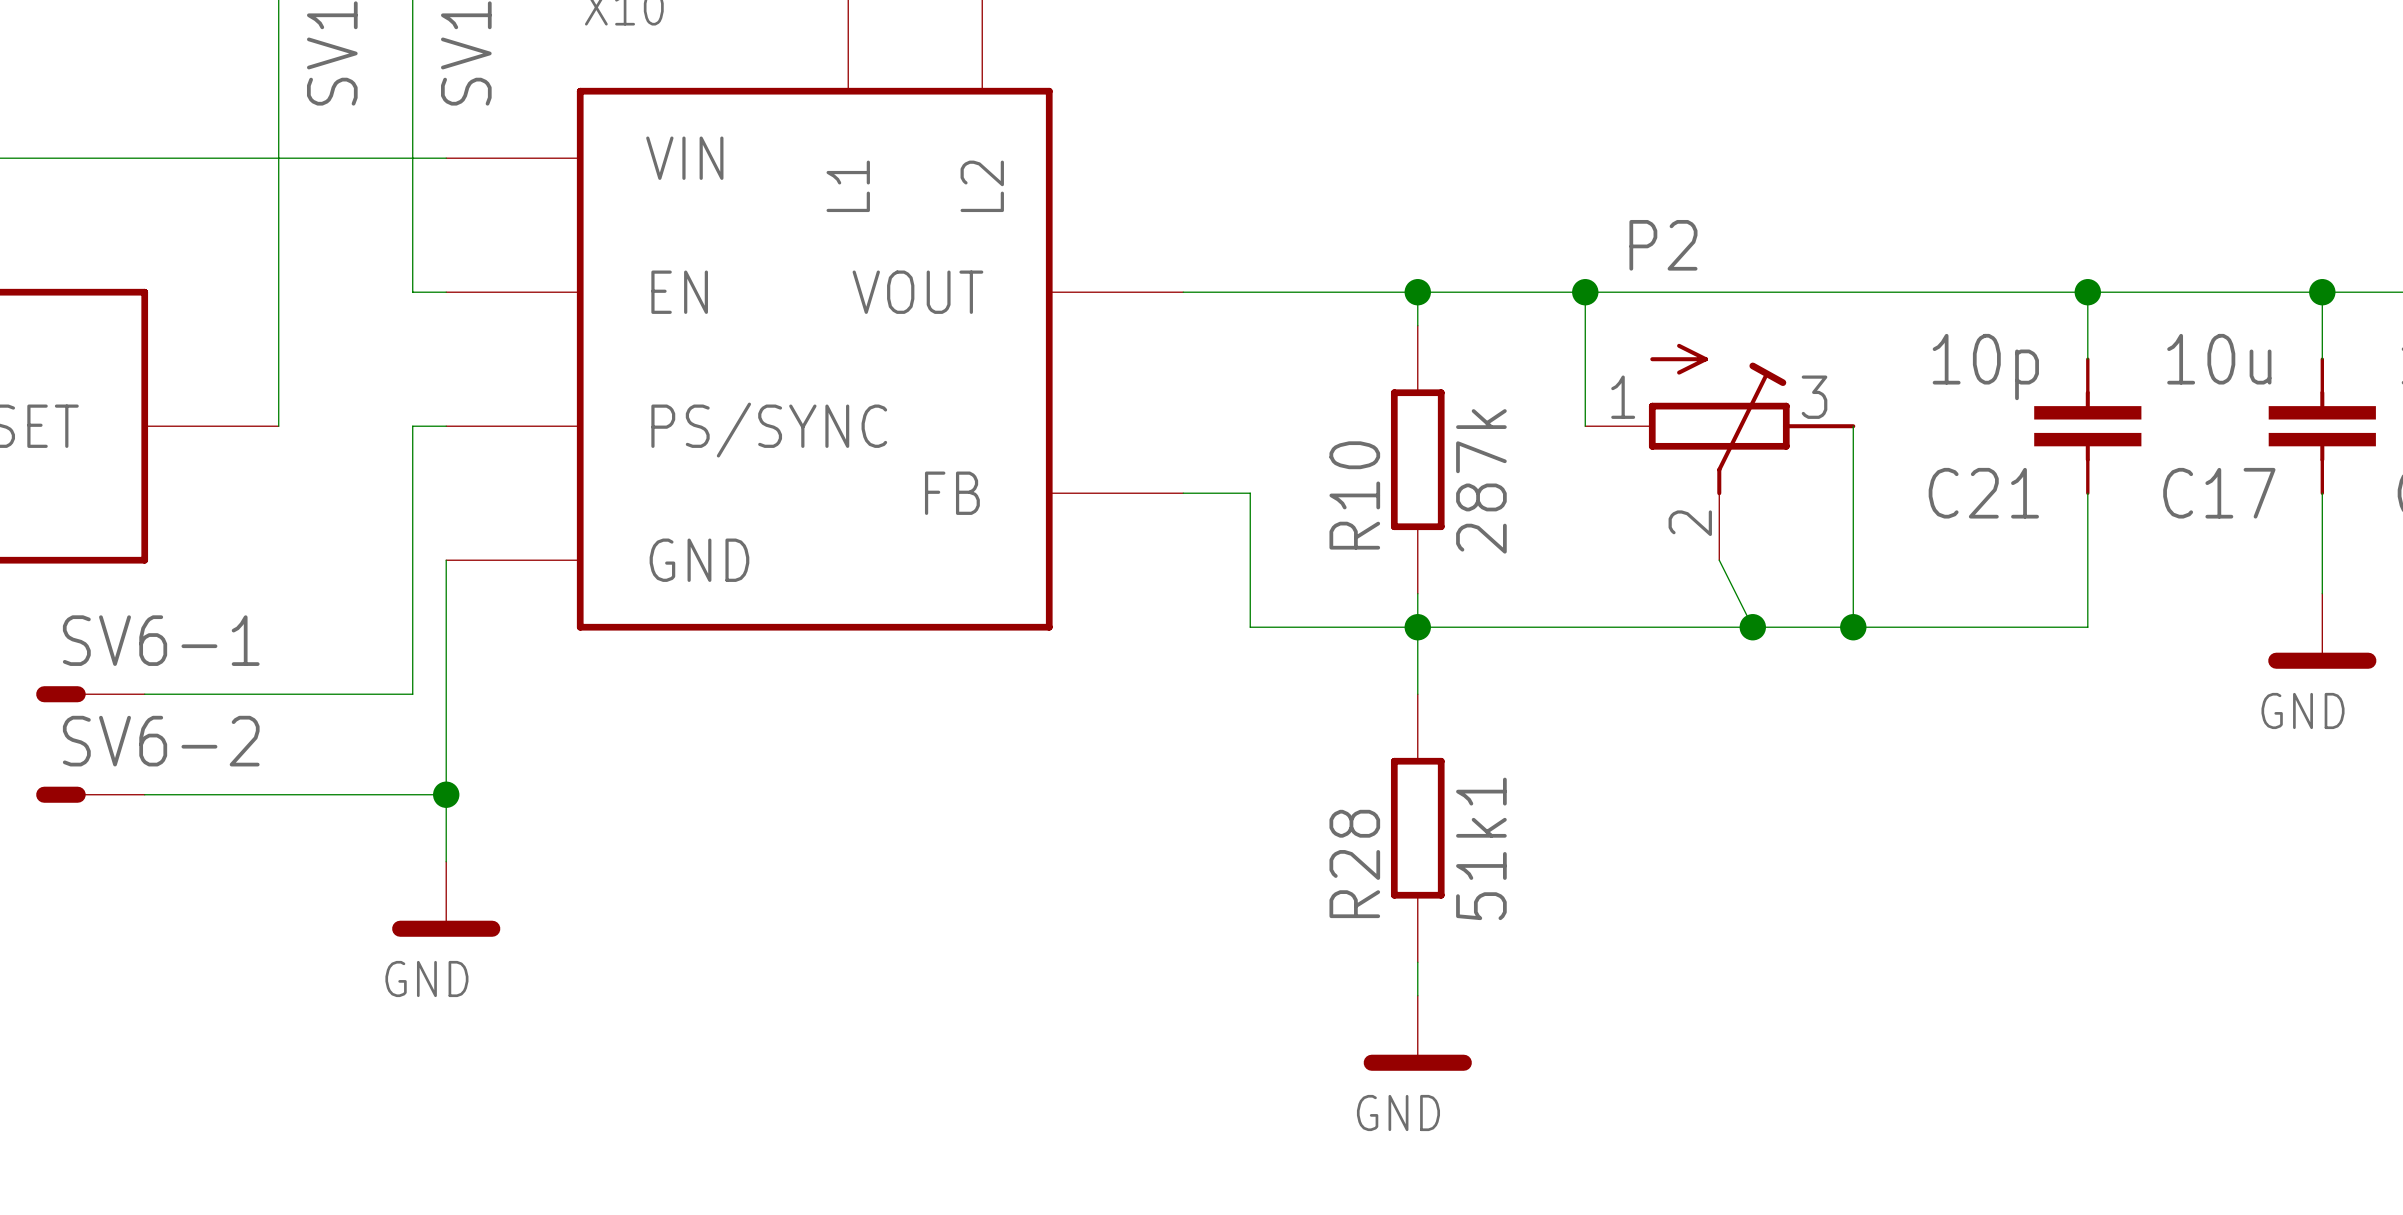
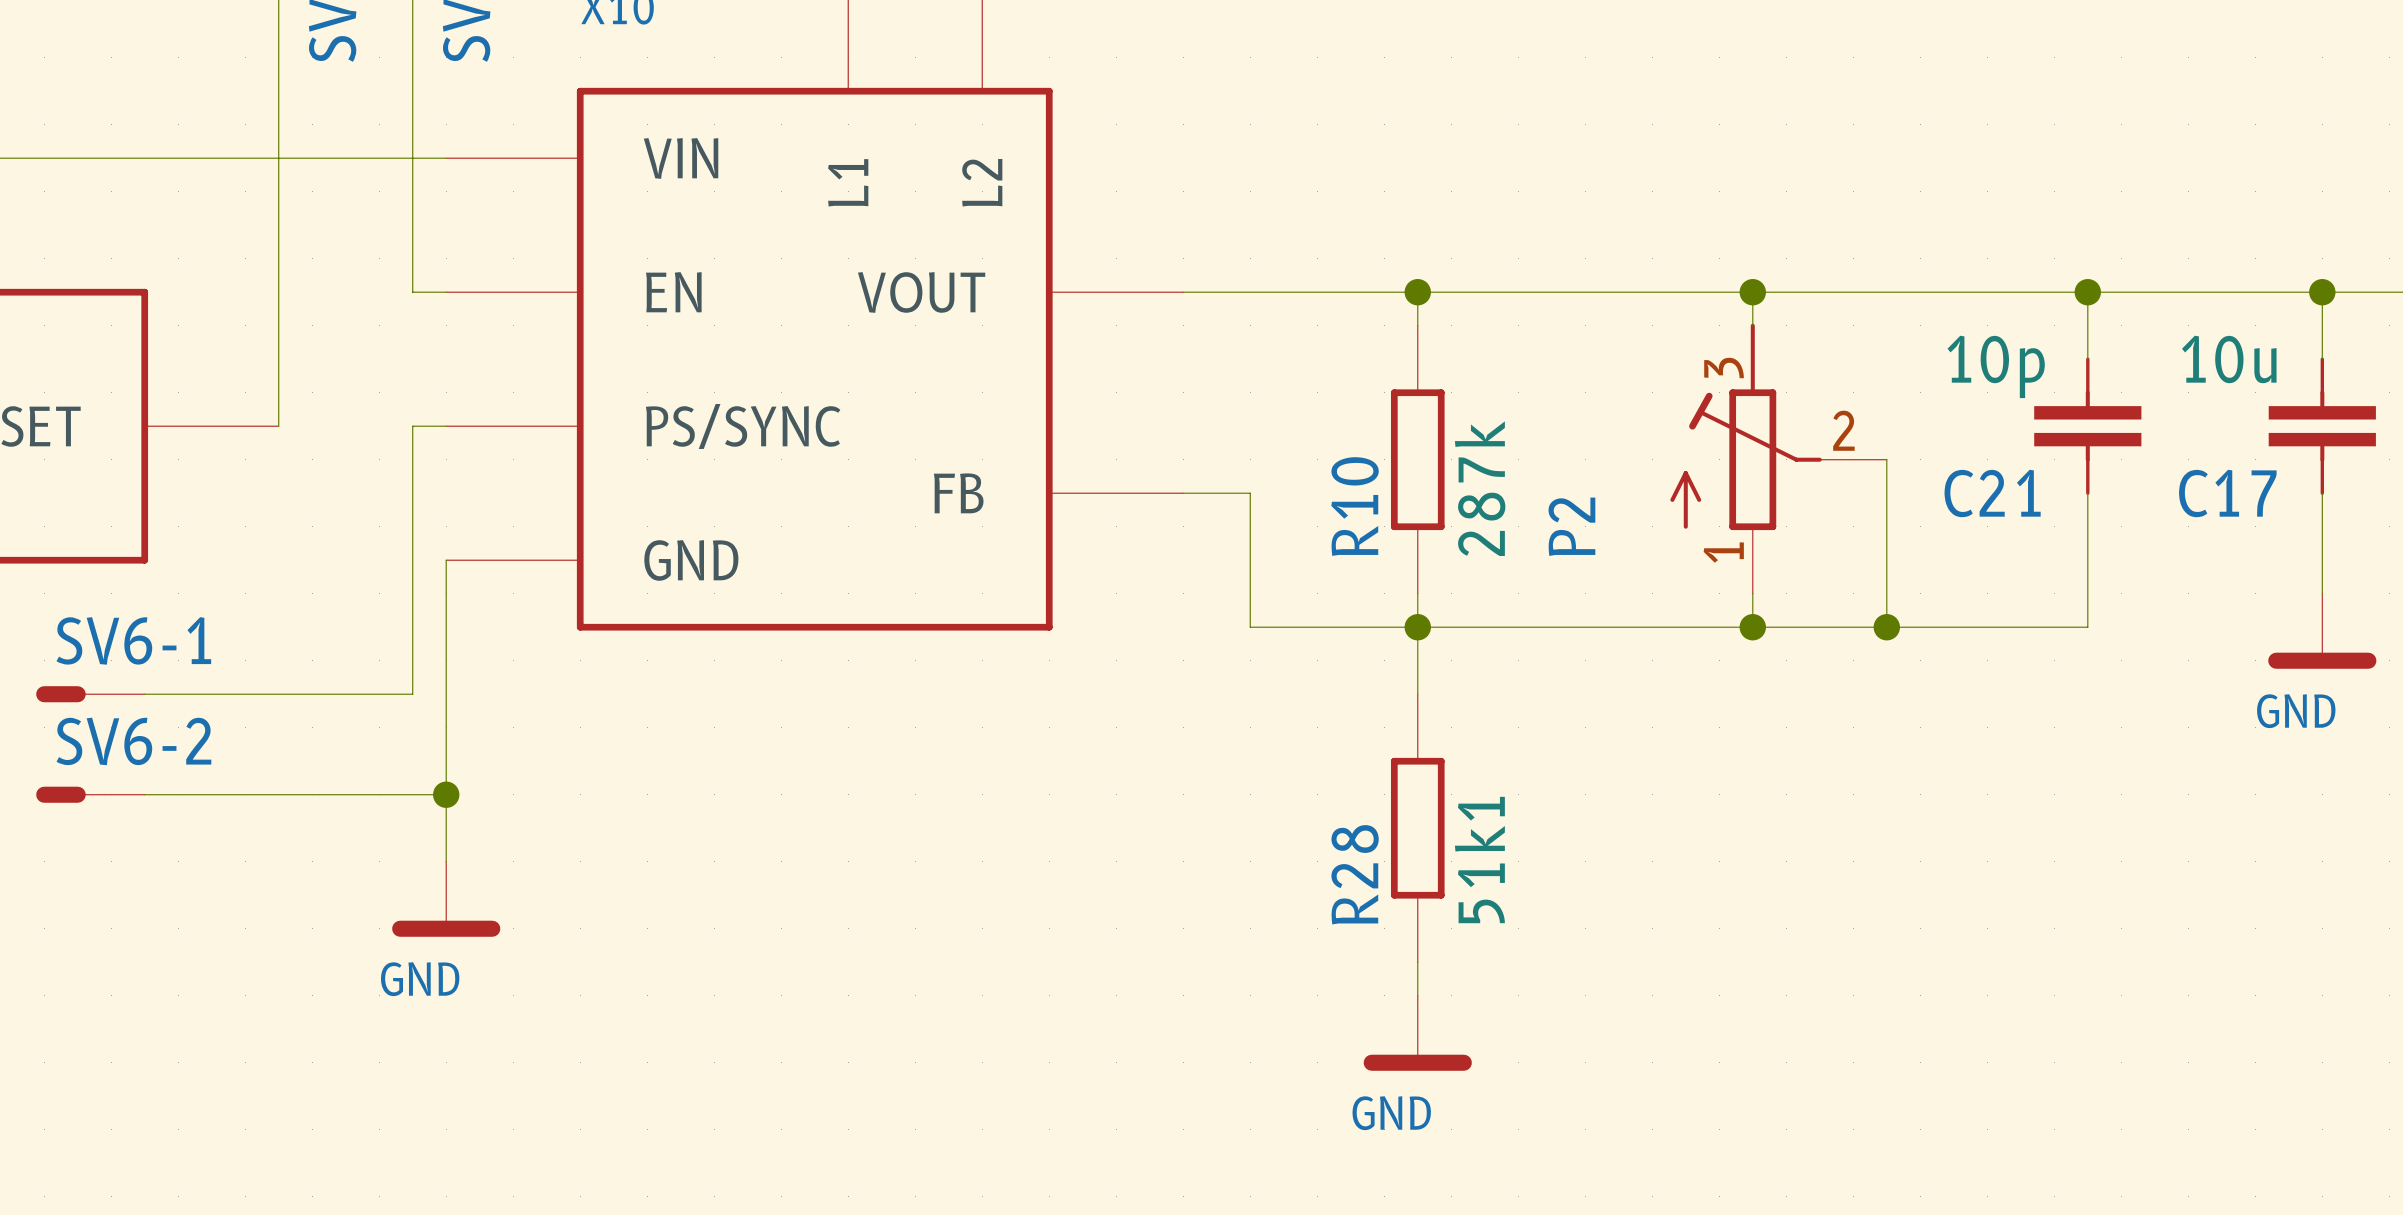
wire: (1585, 292) (1585, 426) -> none
junction: (1585, 292) -> none
wire: none -> (1752, 292) (1752, 325)
junction: none -> (1752, 292)
P2 rotation: 0° (1752, 419) -> 90° counterclockwise (1746, 426)
wire: (1853, 426) (1853, 627) -> none
wire: none -> (1886, 459) (1886, 627)
wire: (1719, 560) (1752, 627) -> (1752, 593) (1752, 627)
junction position: (1853, 627) -> (1886, 627)

